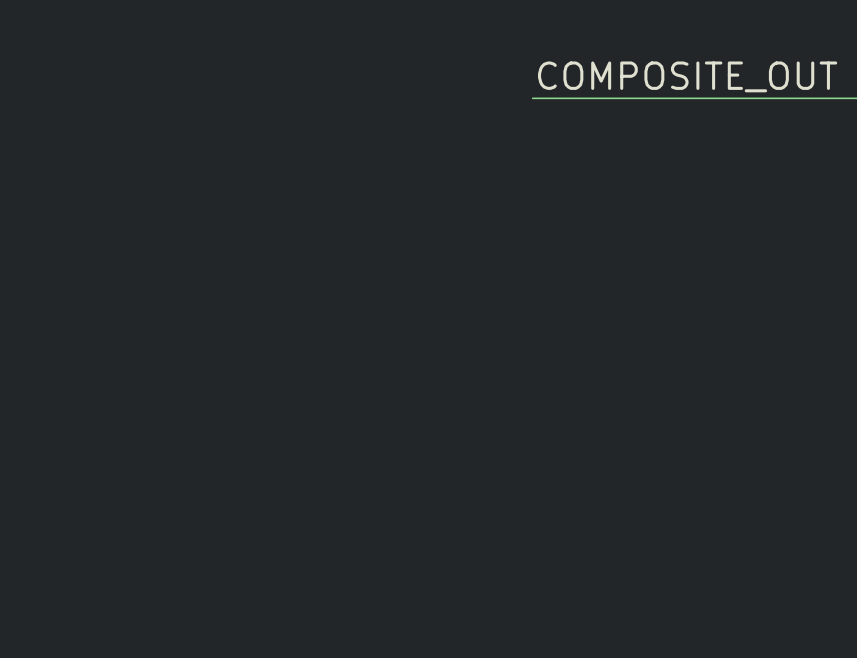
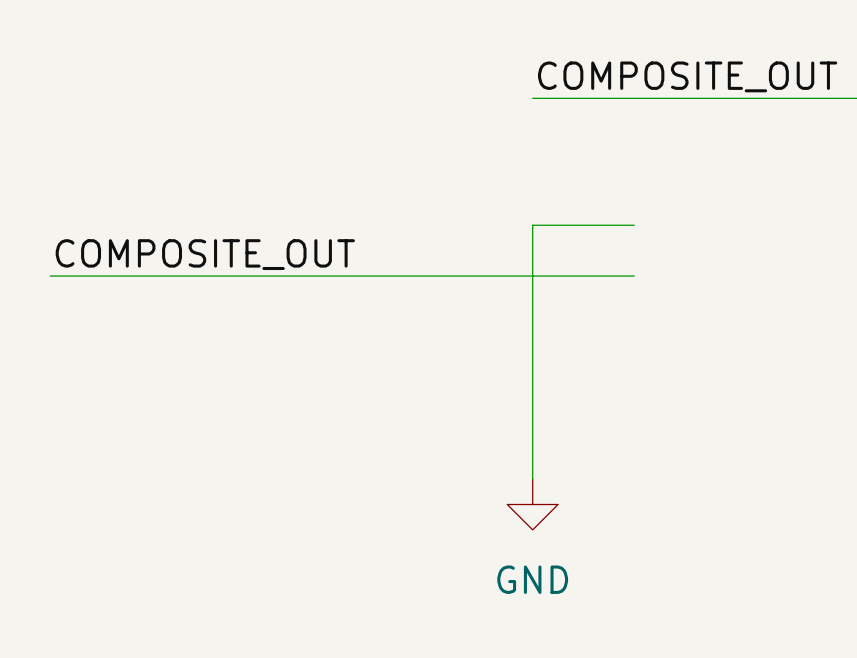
wire: none -> (634, 225) (532, 225) (532, 479)
label: none -> COMPOSITE_OUT (205, 254)
wire: none -> (50, 276) (634, 276)
power symbol: none -> GND (532, 504)

